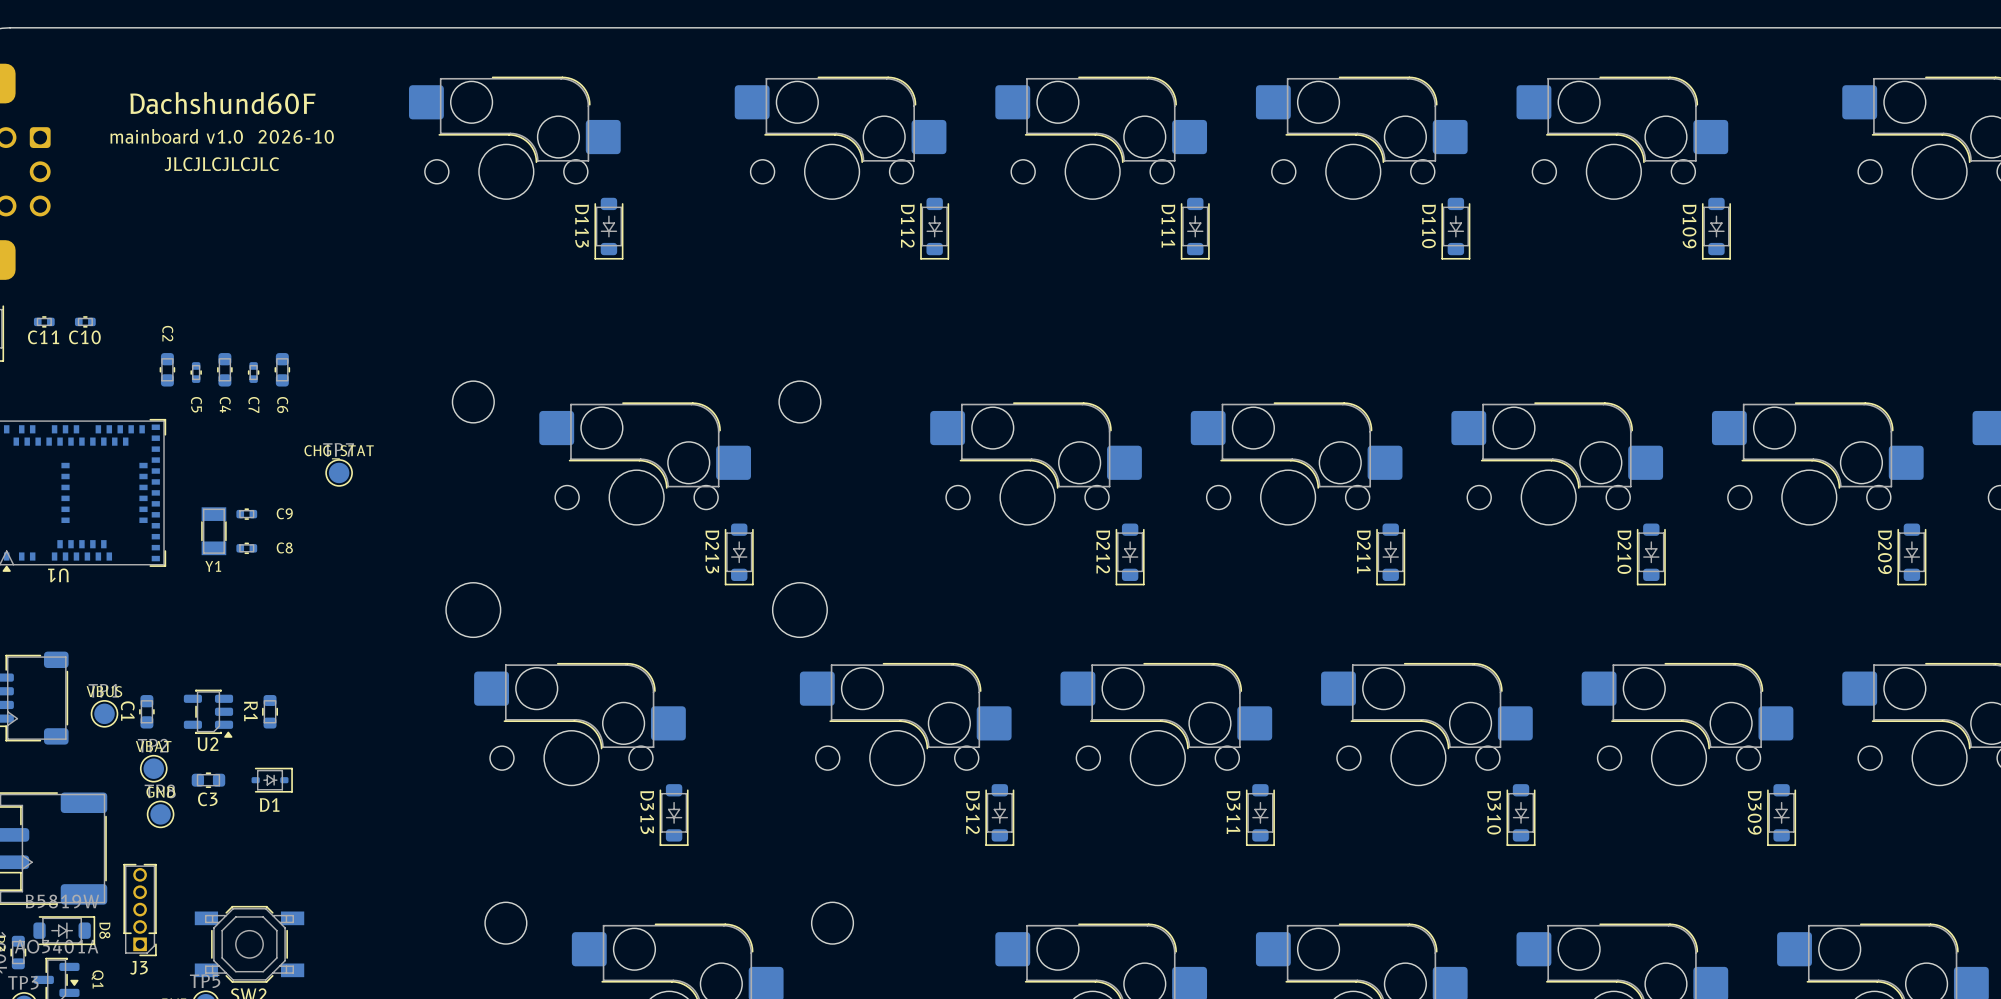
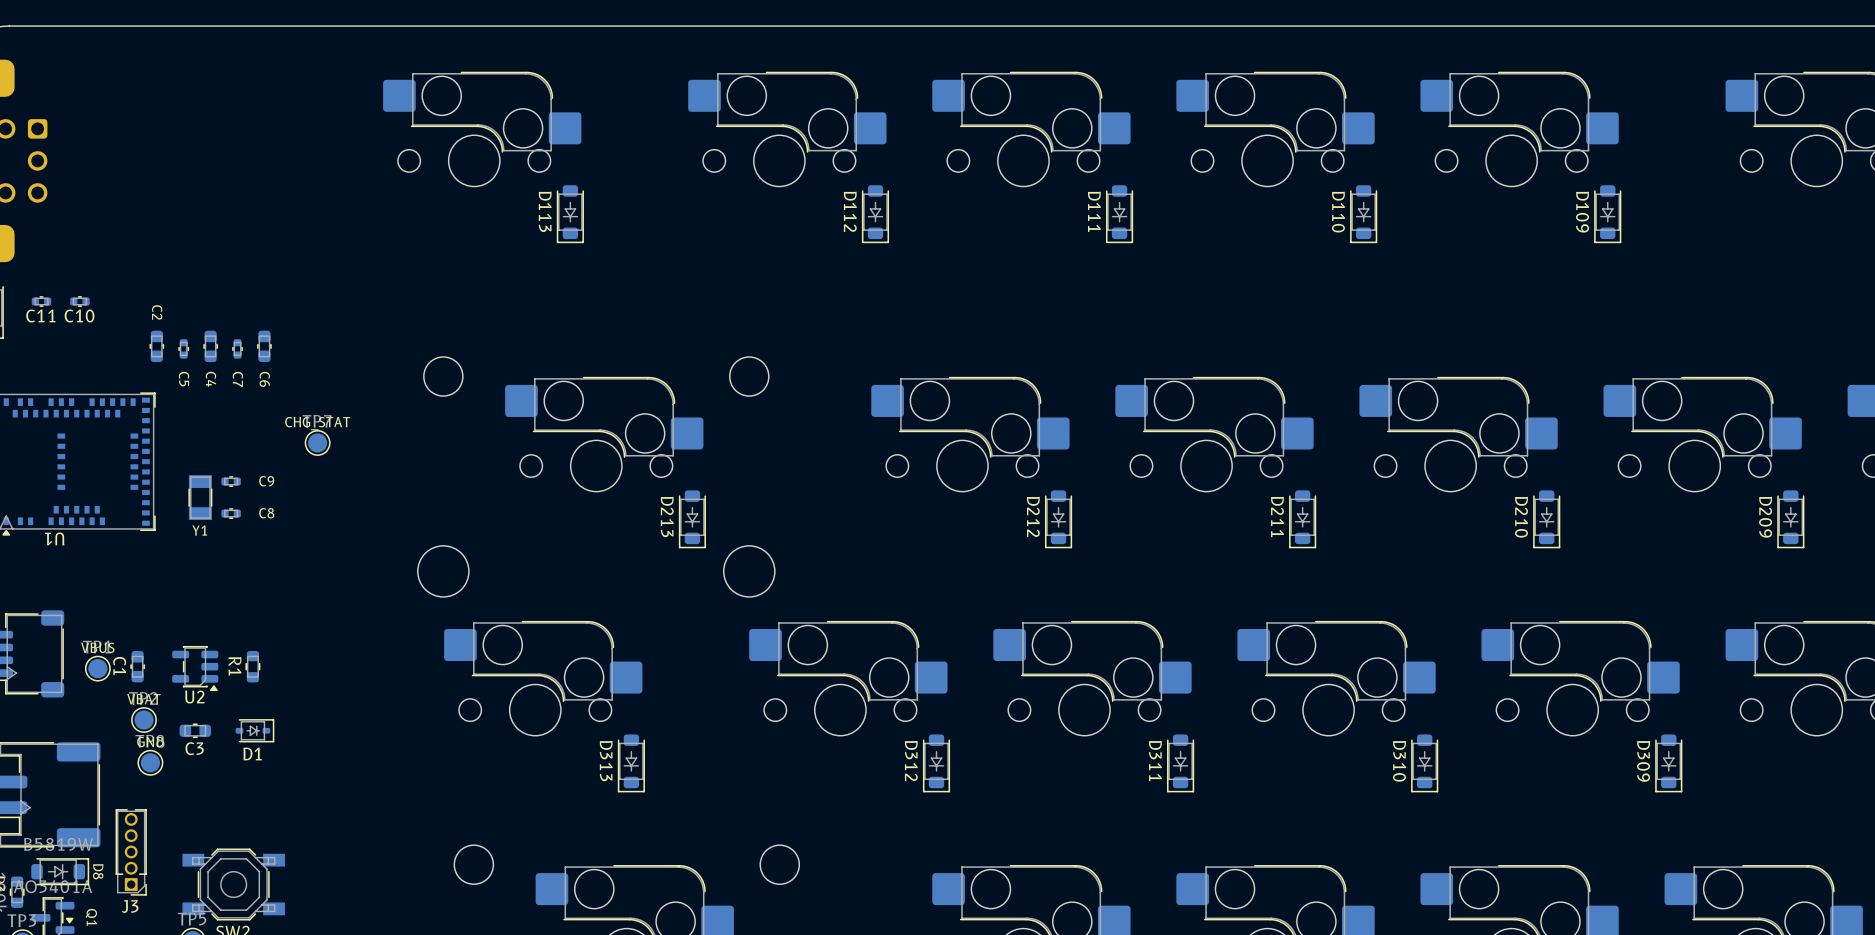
text: Dachshund60F (222, 103) -> none
text: mainboard v1.0 2026-10 (222, 136) -> none
text: JLCJLCJLCJLC (221, 164) -> none

